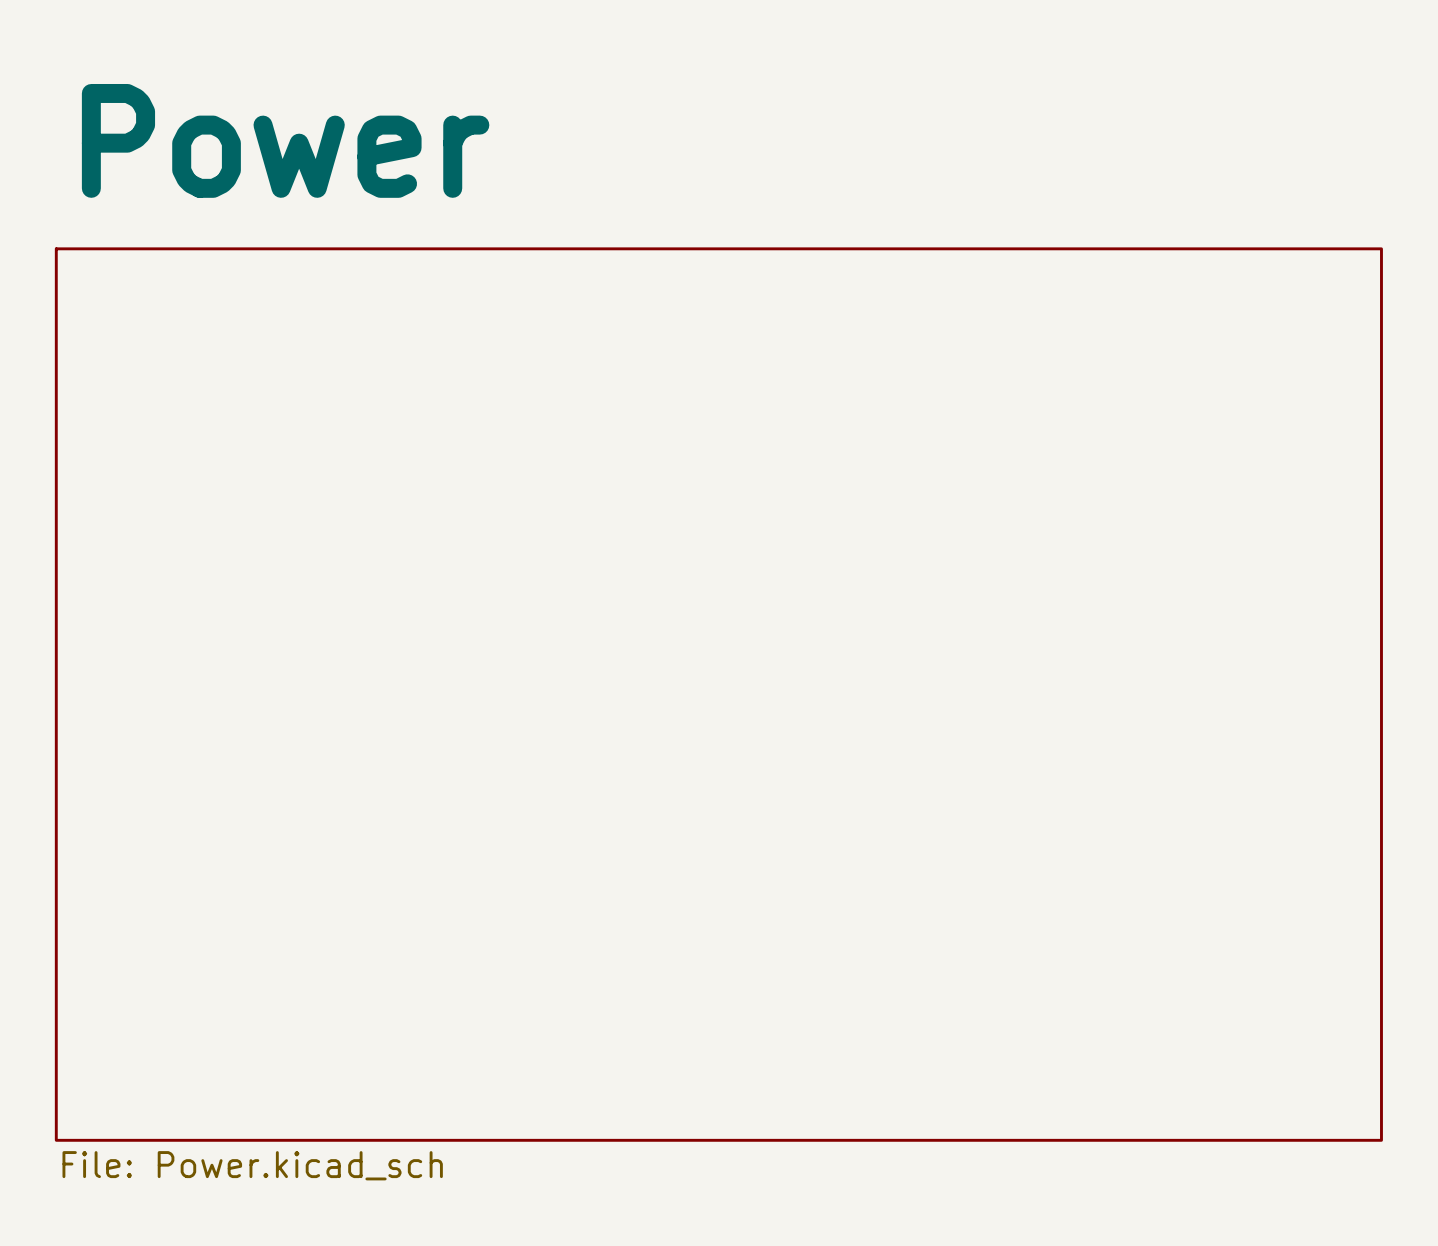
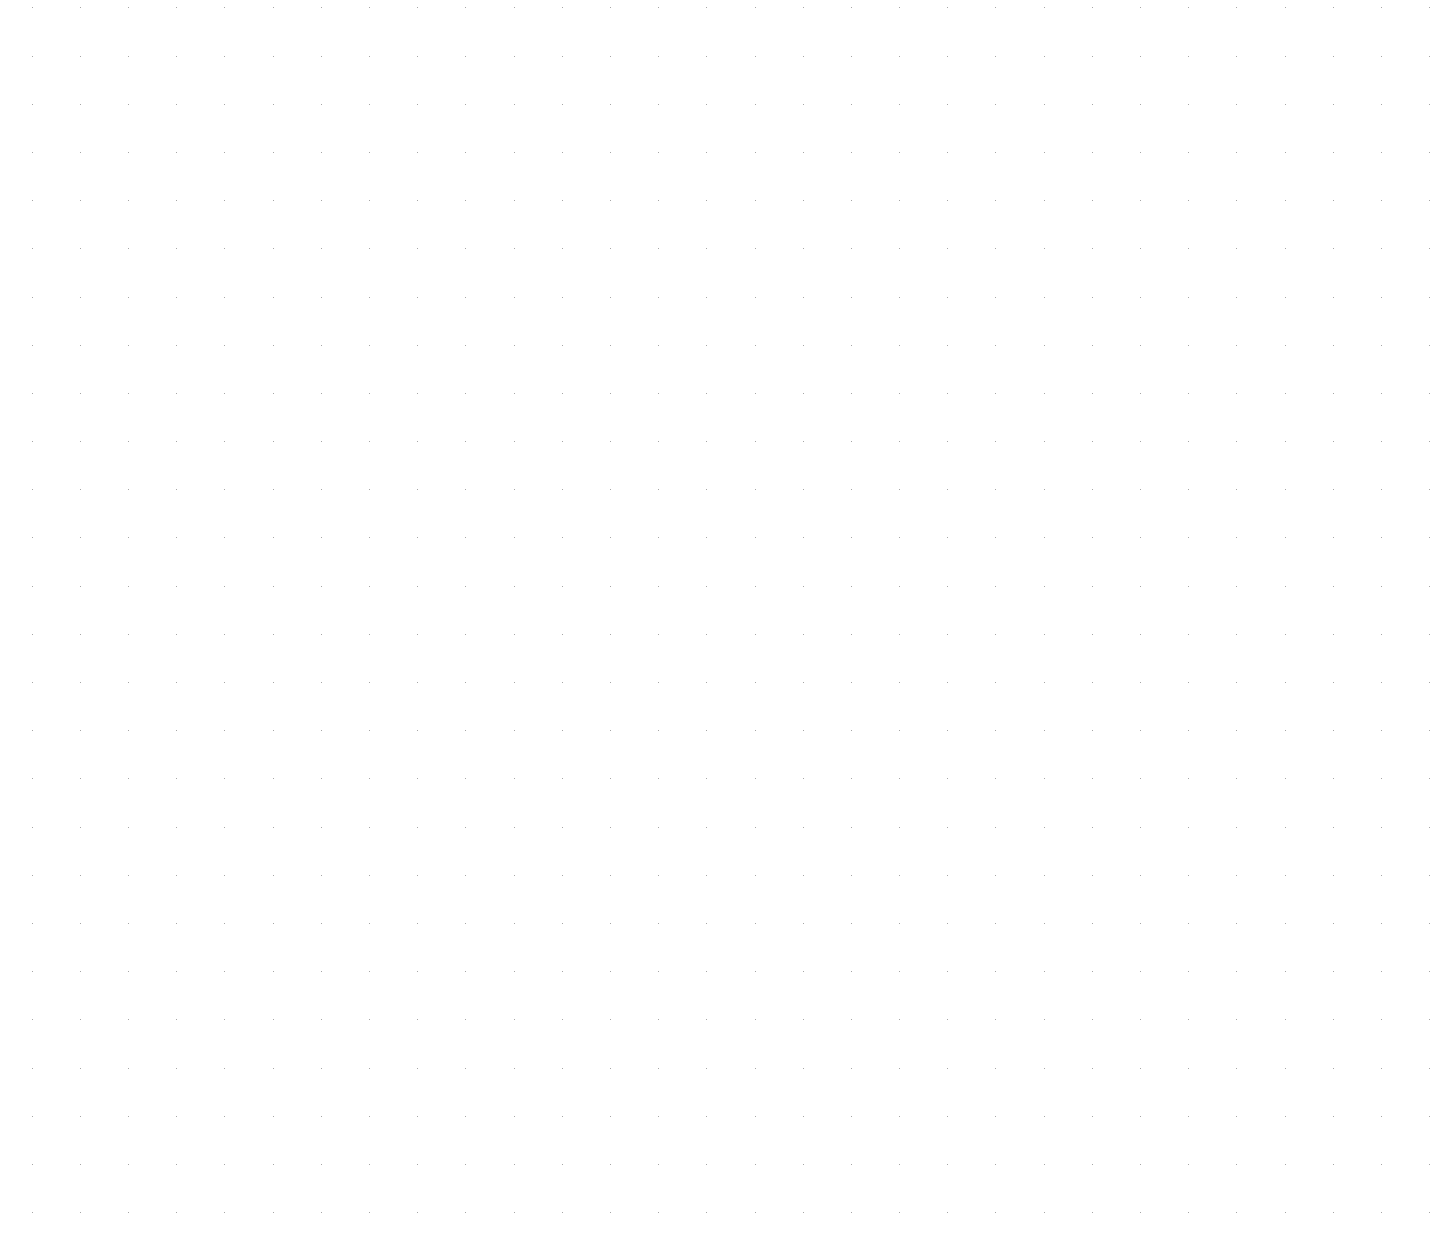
sheet Power: File: Power.kicad_sch (718, 694) -> none

